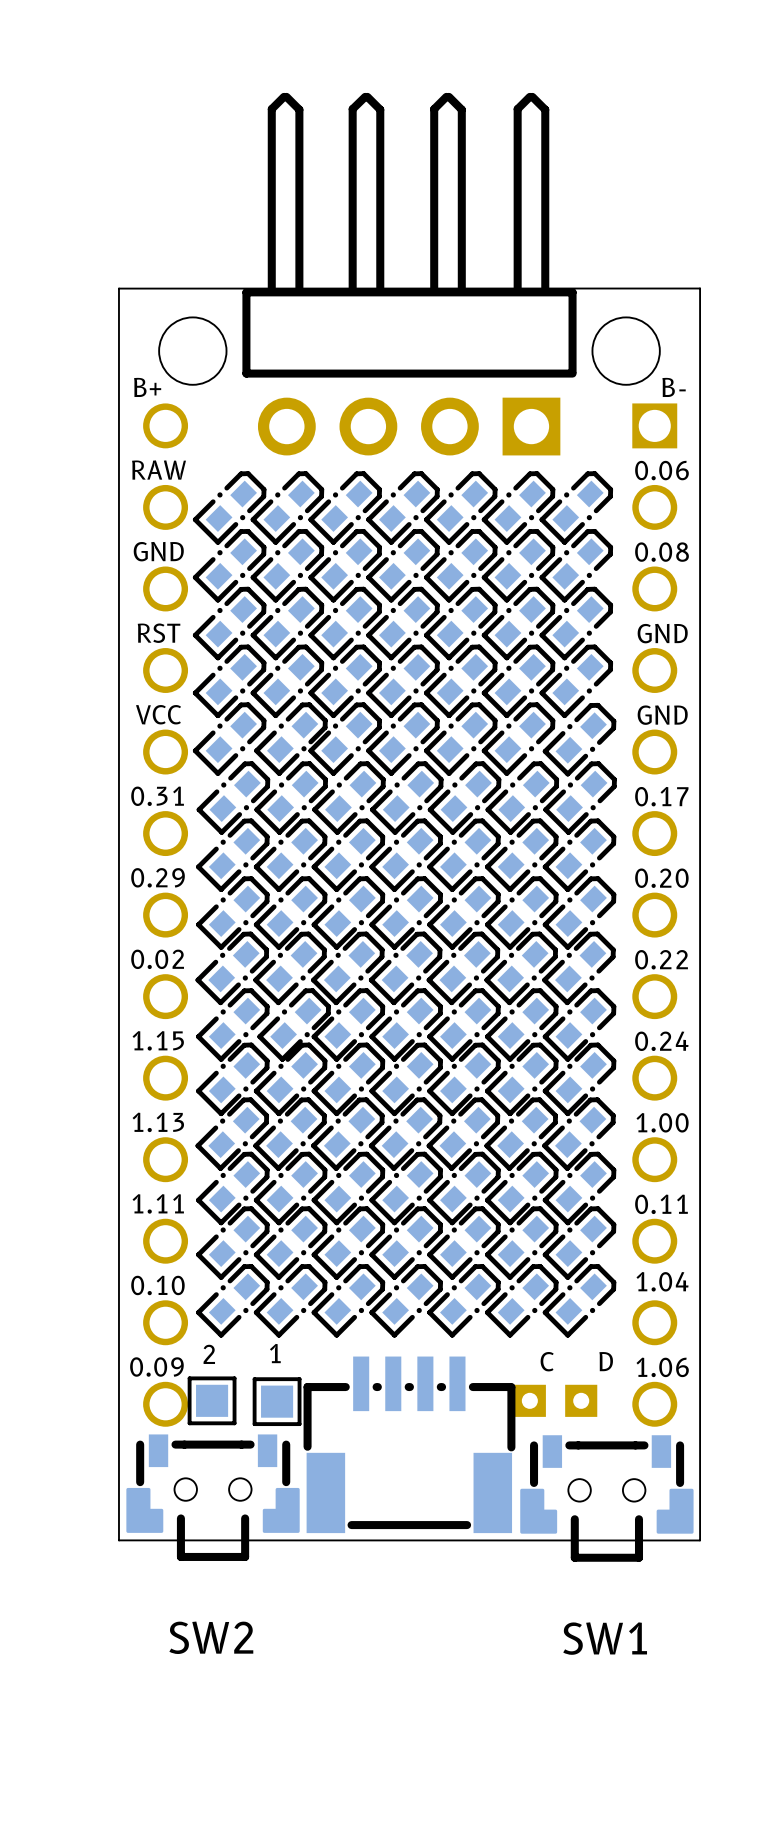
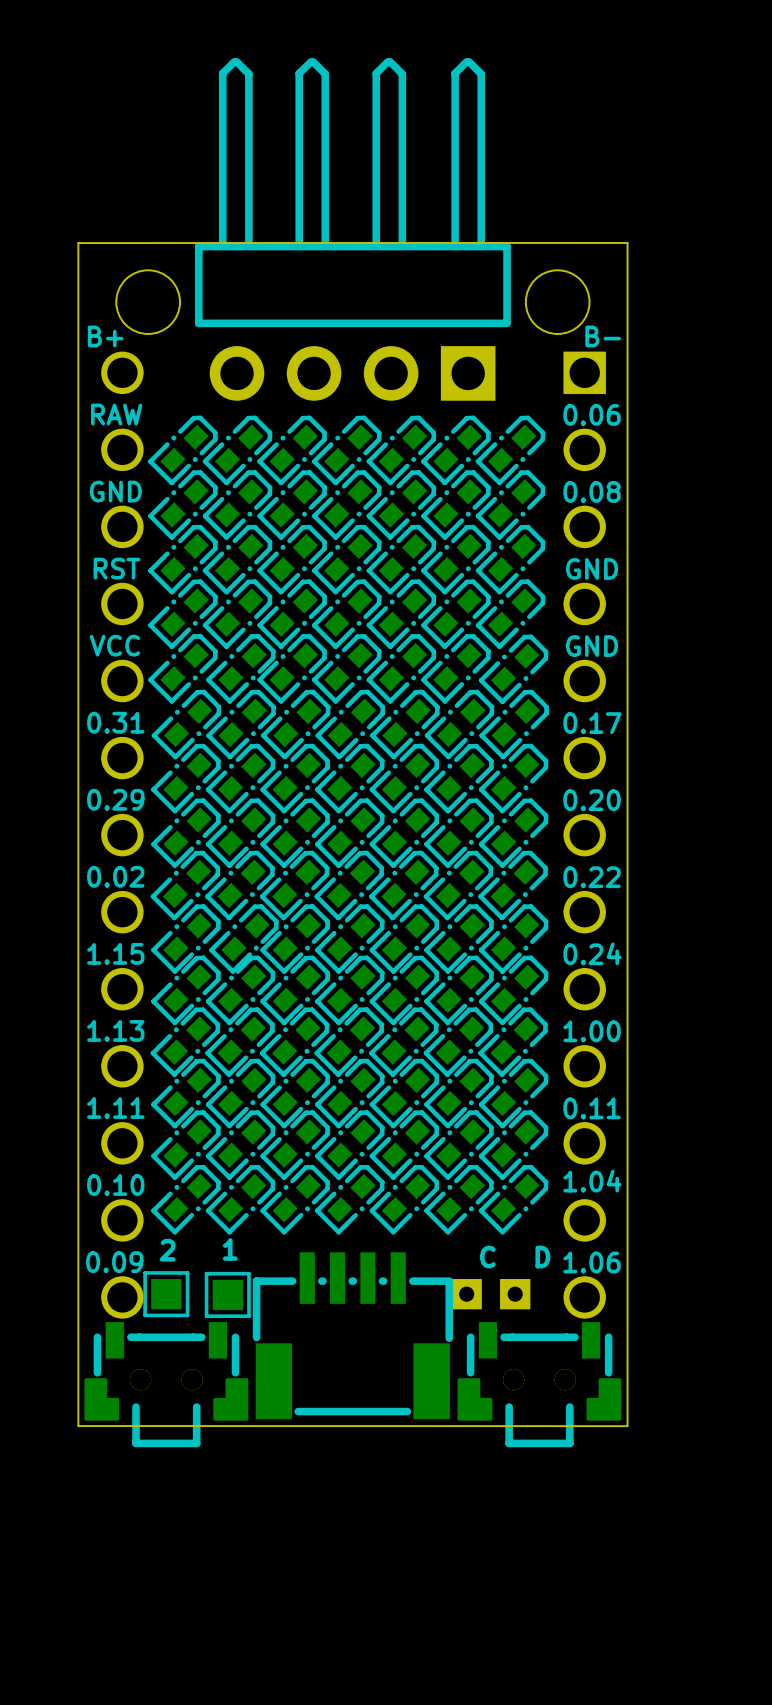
part: none -> (166, 1384)
part: none -> (539, 1384)
SW2: (213, 1497) -> none
SW1: (606, 1498) -> none

